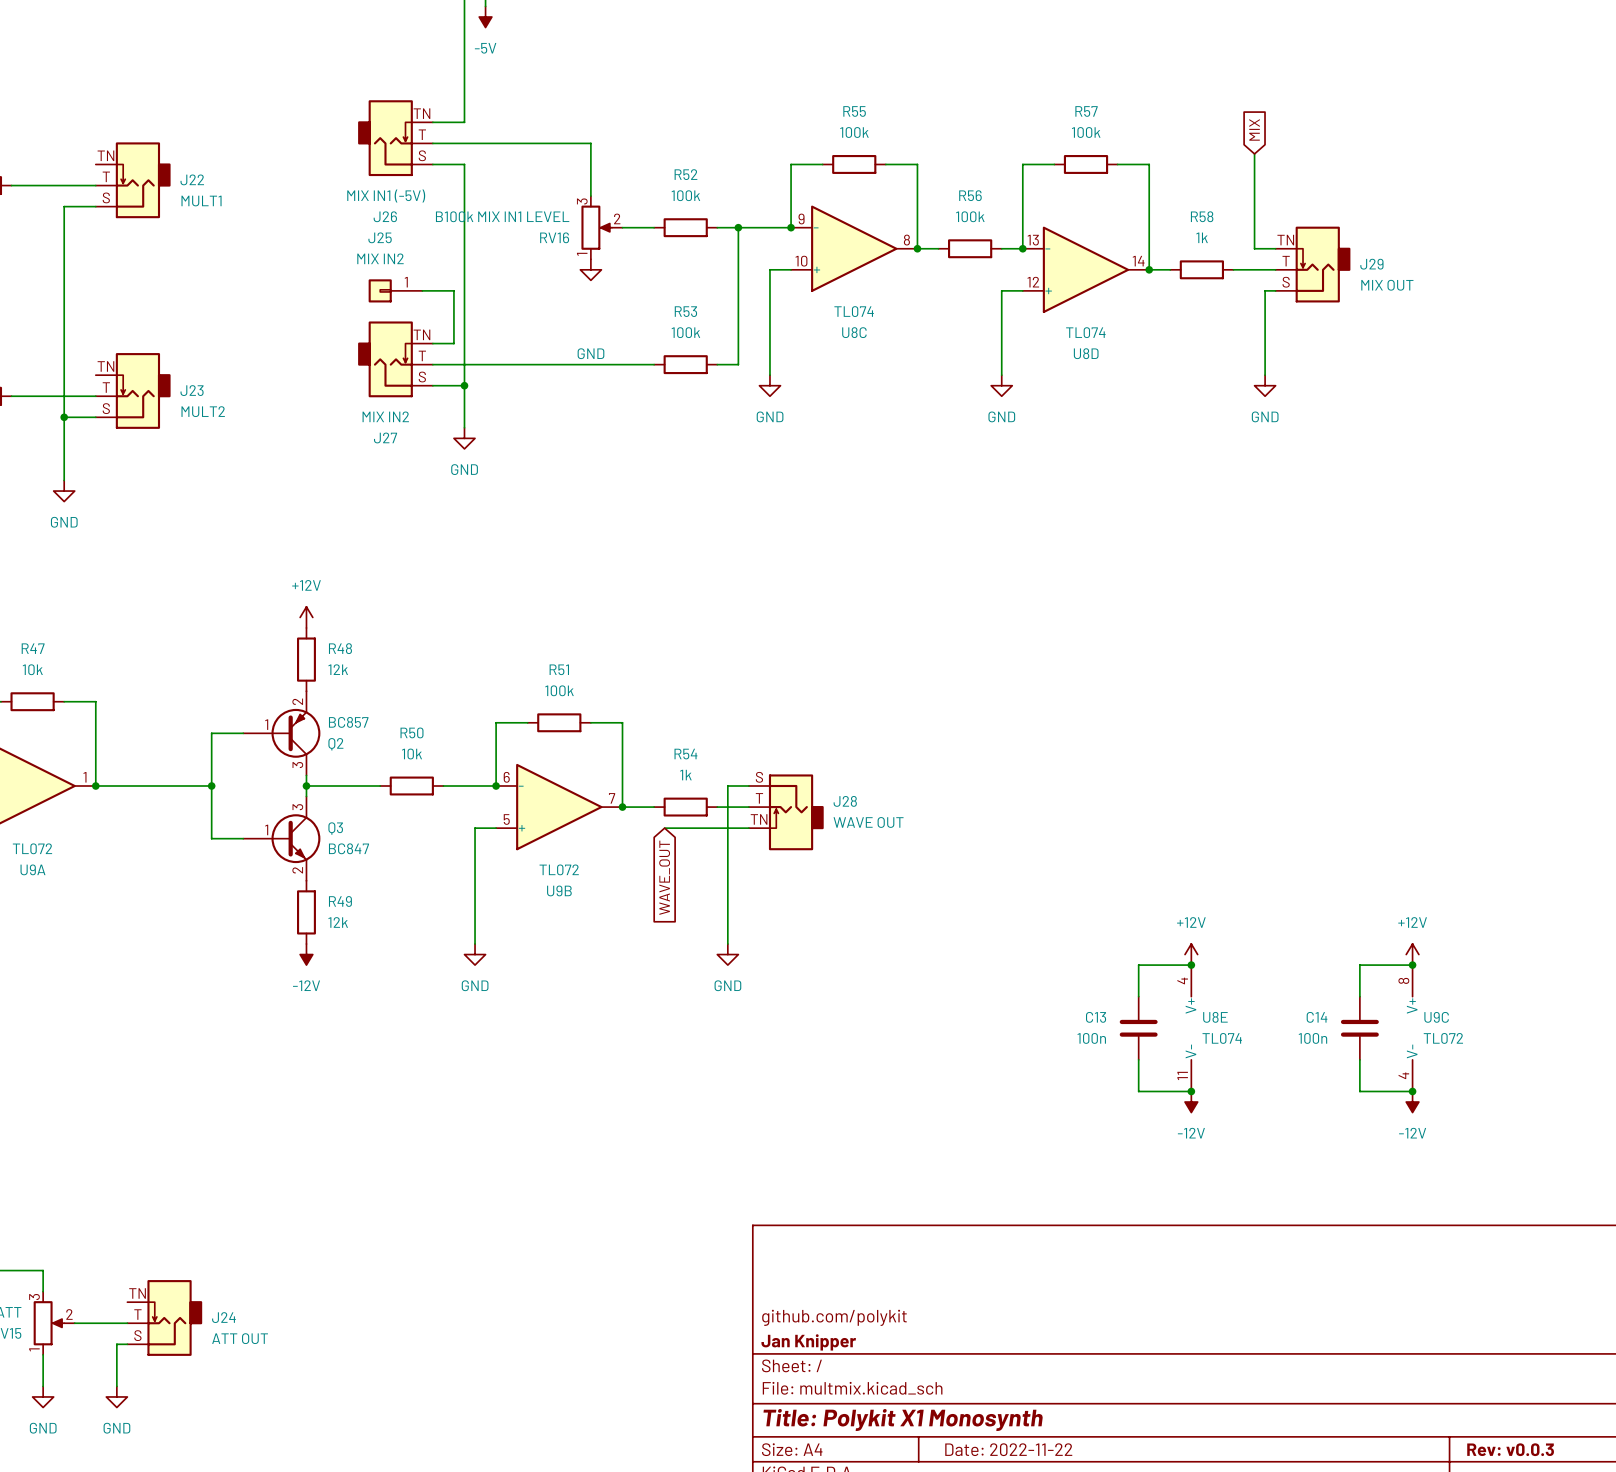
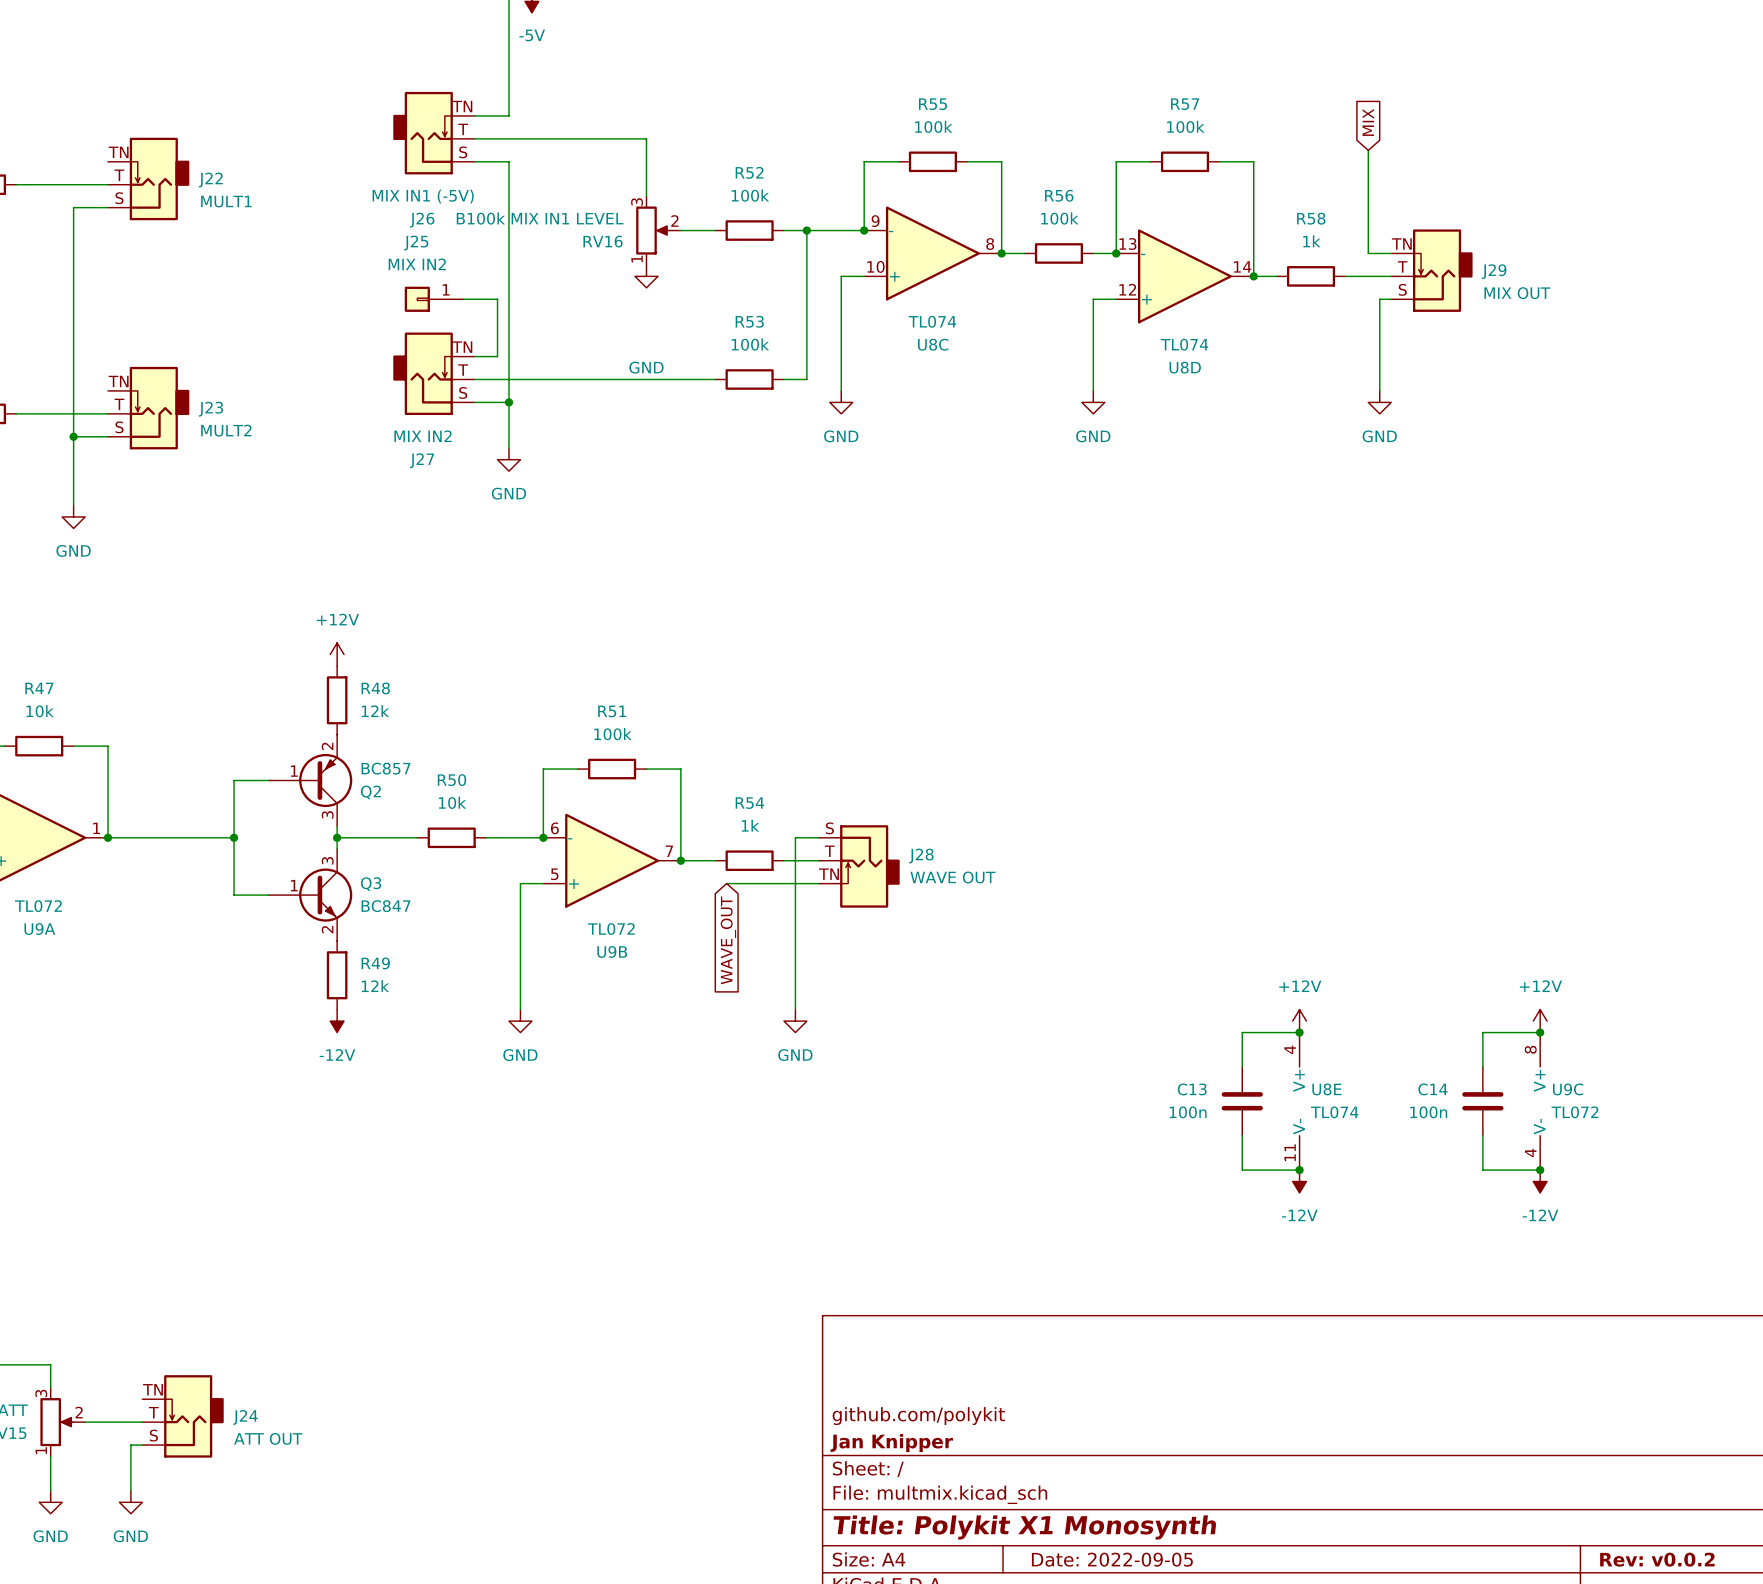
title block: Date: 2022-11-22 (1008, 1449) -> Date: 2022-09-05 (1112, 1559)
title block: Rev: v0.0.3 (1510, 1449) -> Rev: v0.0.2 (1657, 1559)

